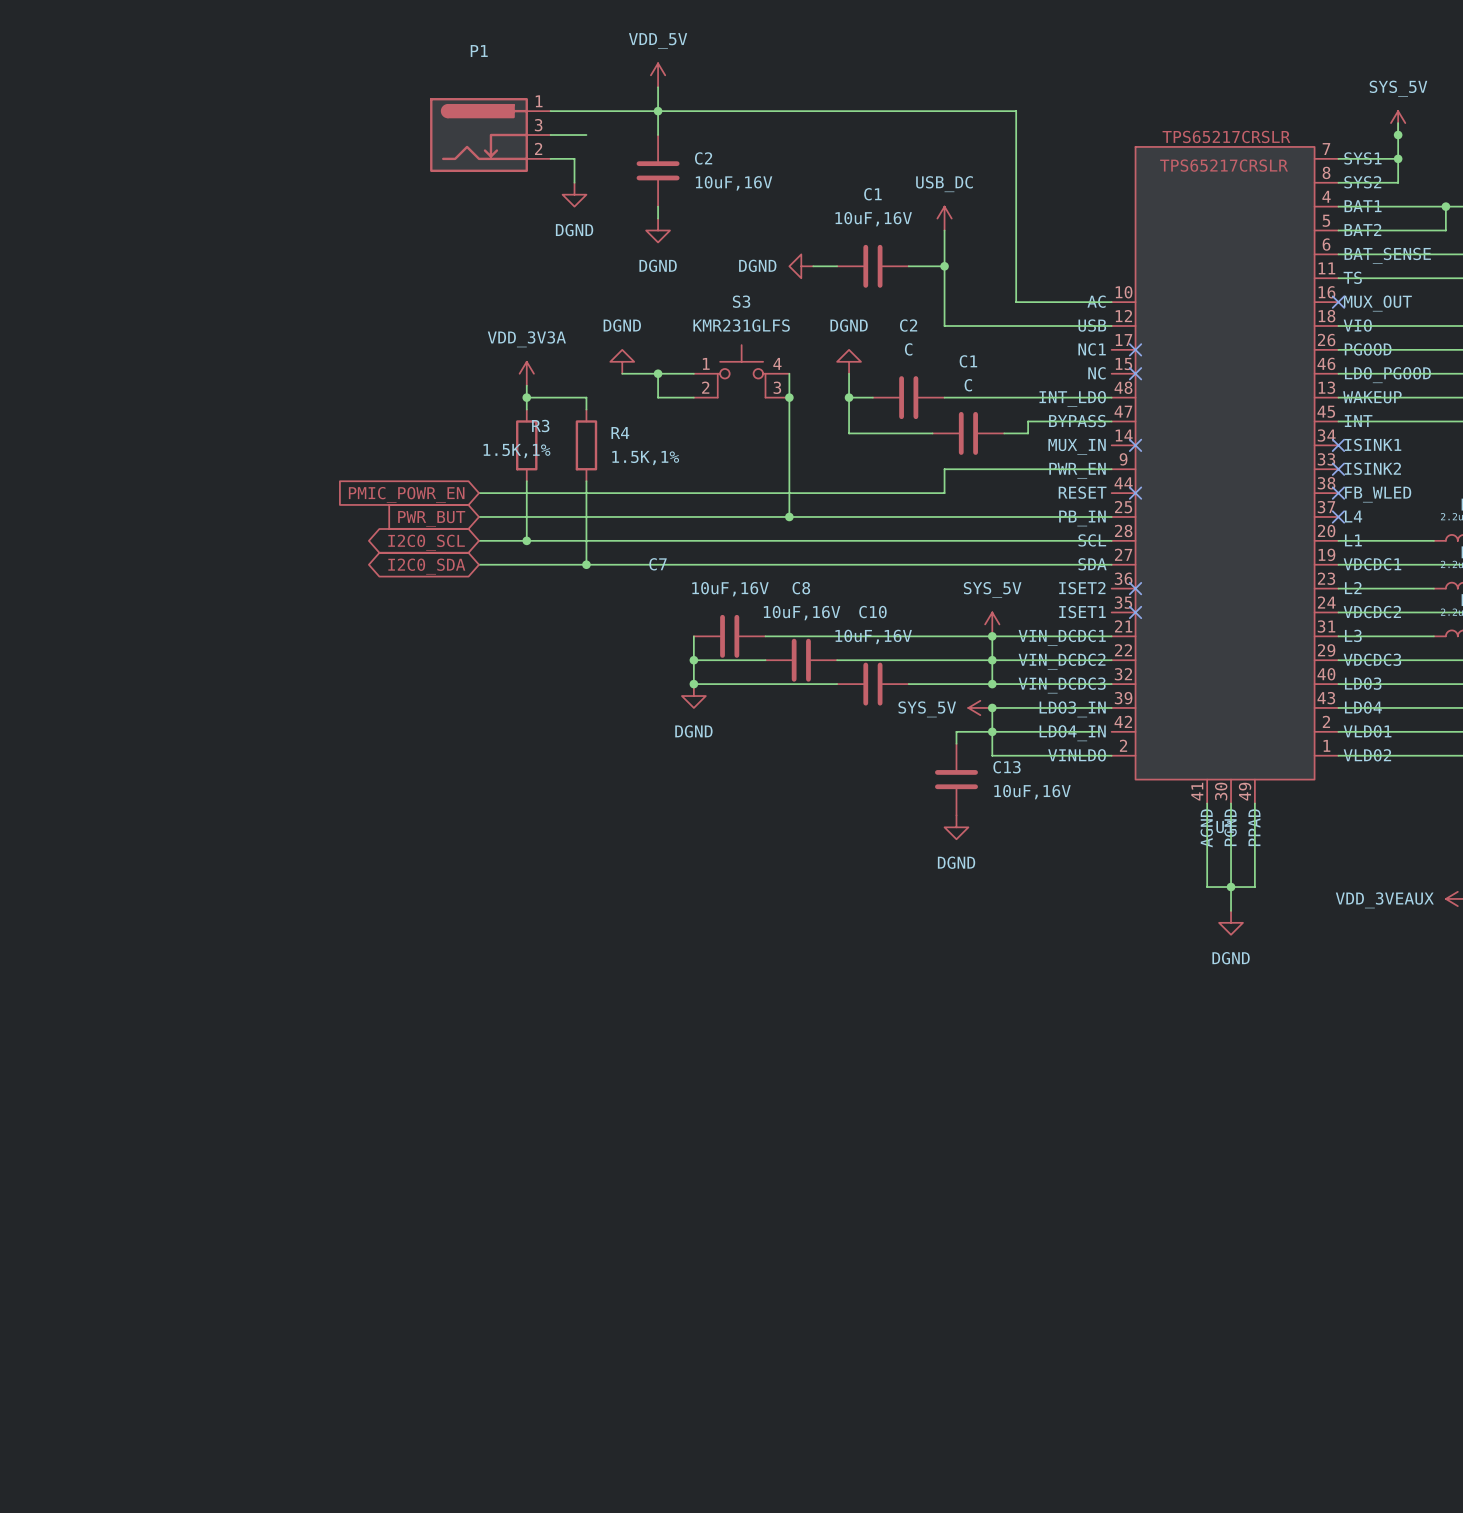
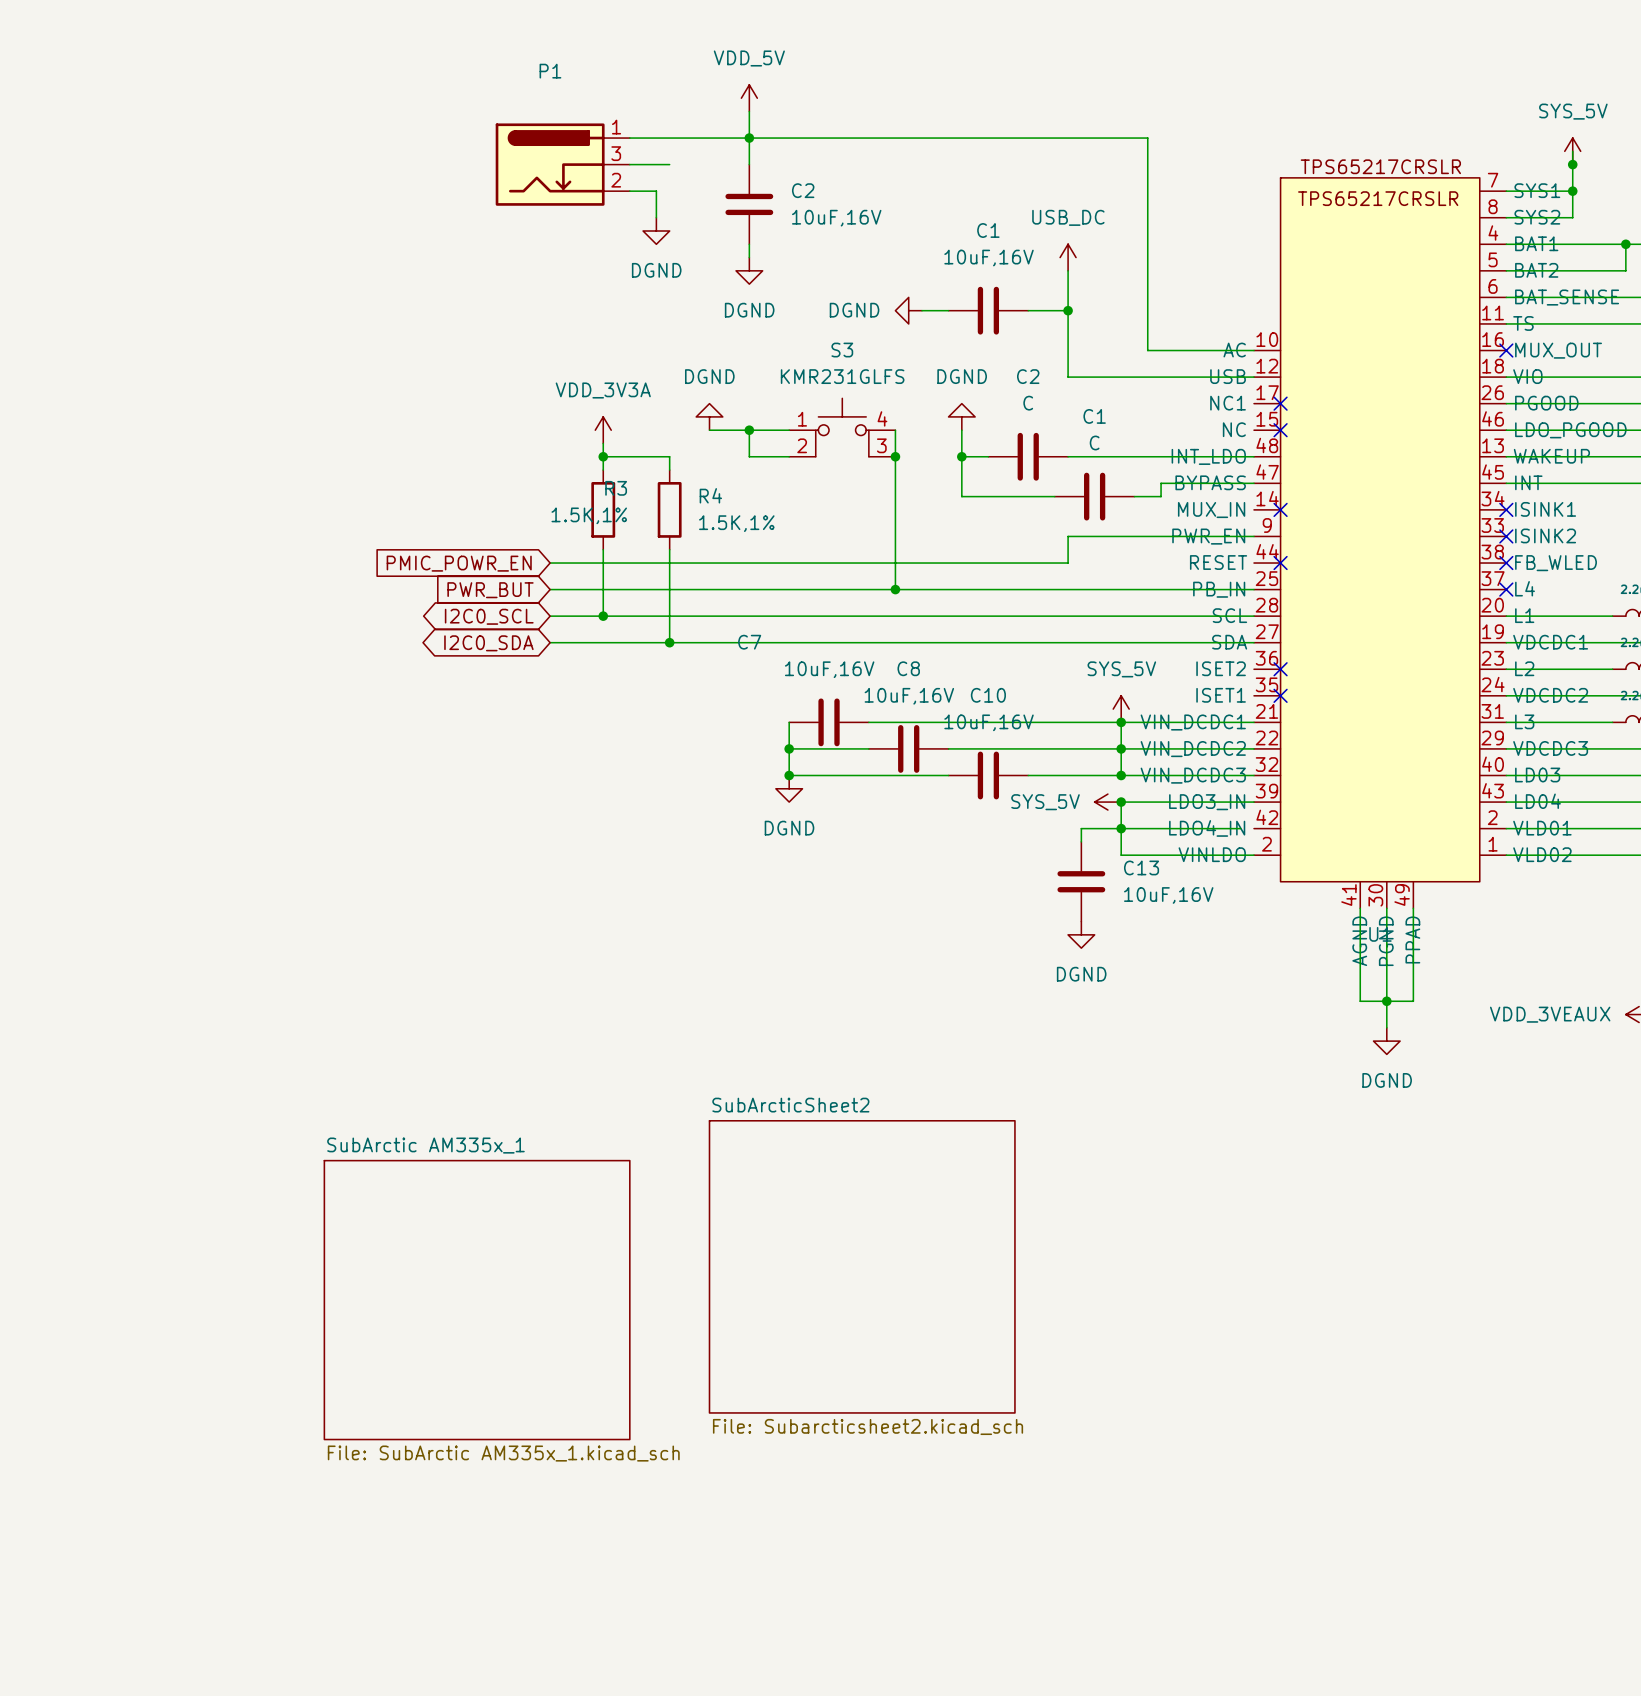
sheet SubArcticSheet2: none -> File: Subarcticsheet2.kicad_sch (862, 1266)
sheet SubArctic AM335x_1: none -> File: SubArctic AM335x_1.kicad_sch (477, 1300)

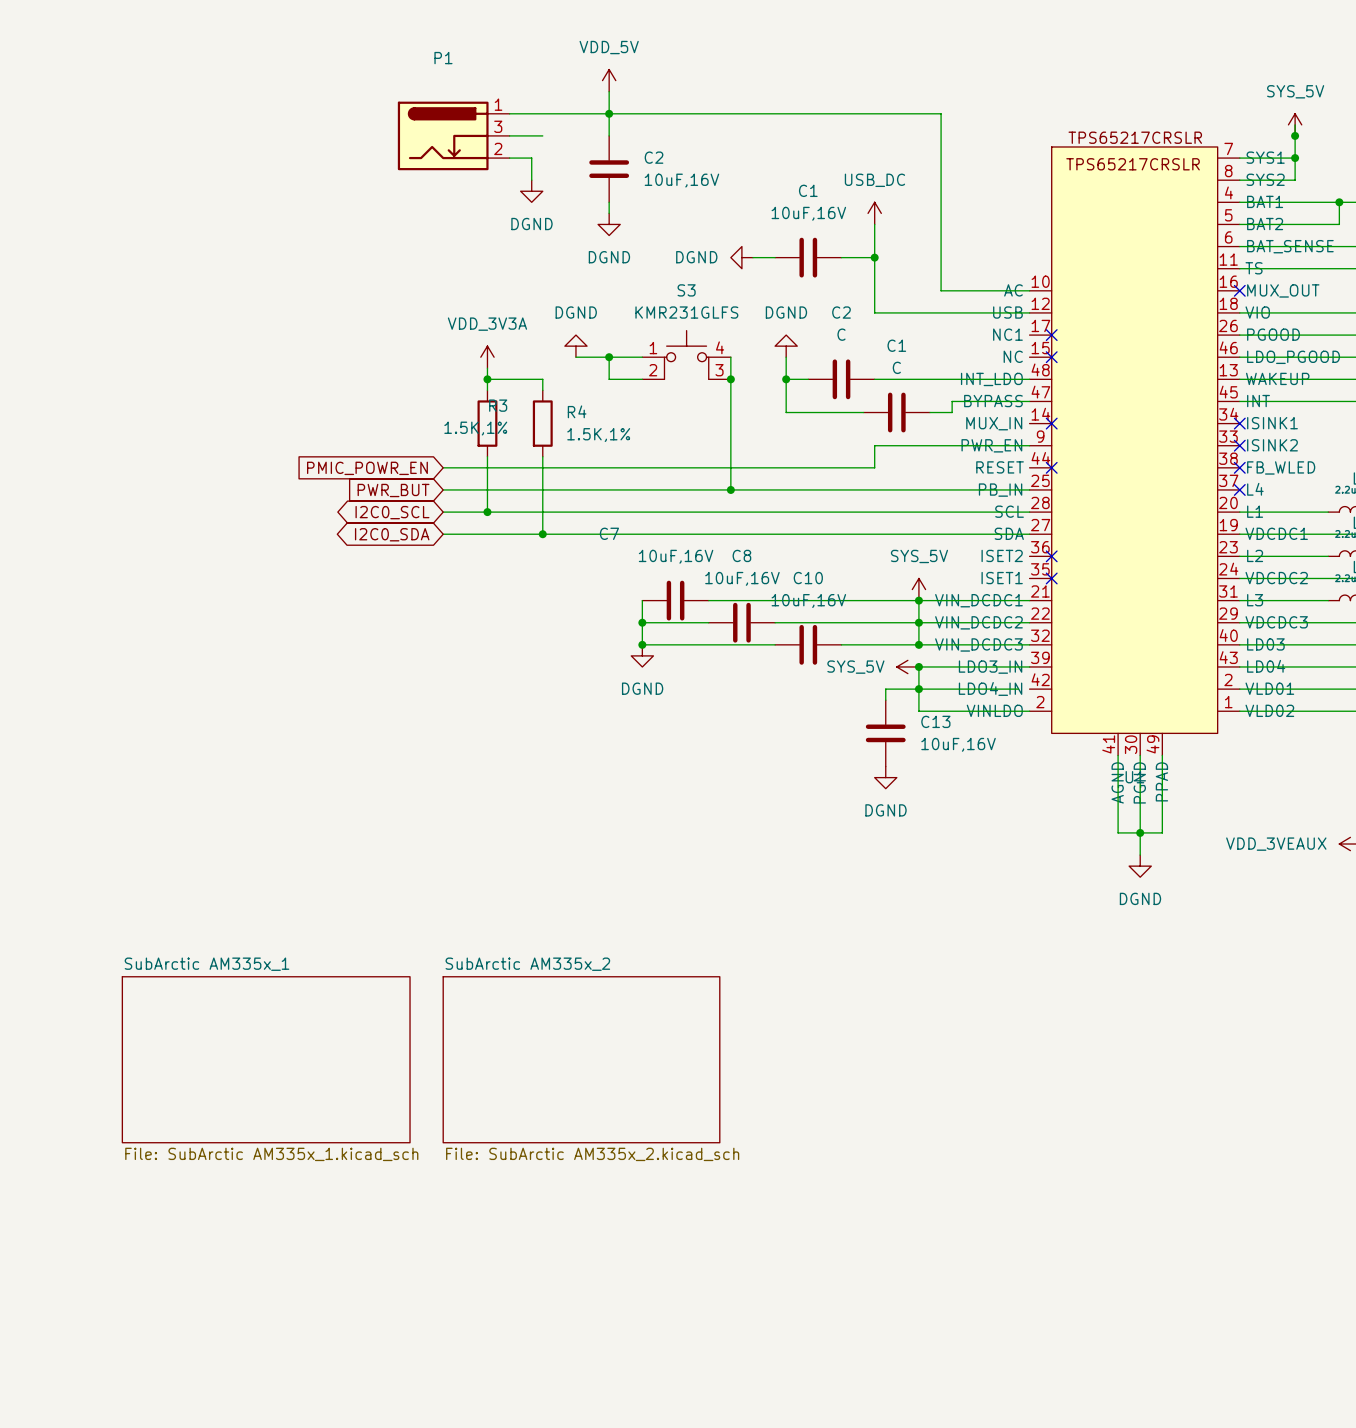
sheet SubArctic AM335x_1 name position: SubArctic AM335x_1 (425, 1145) -> SubArctic AM335x_1 (207, 964)
sheet SubArctic AM335x_1 shape: [323, 1159, 631, 1441] -> [121, 976, 411, 1144]
sheet SubArcticSheet2: File: Subarcticsheet2.kicad_sch (862, 1266) -> none
sheet SubArctic AM335x_2: none -> File: SubArctic AM335x_2.kicad_sch (581, 1059)
sheet SubArctic AM335x_1 value position: File: SubArctic AM335x_1.kicad_sch (503, 1453) -> File: SubArctic AM335x_1.kicad_sch (271, 1154)

